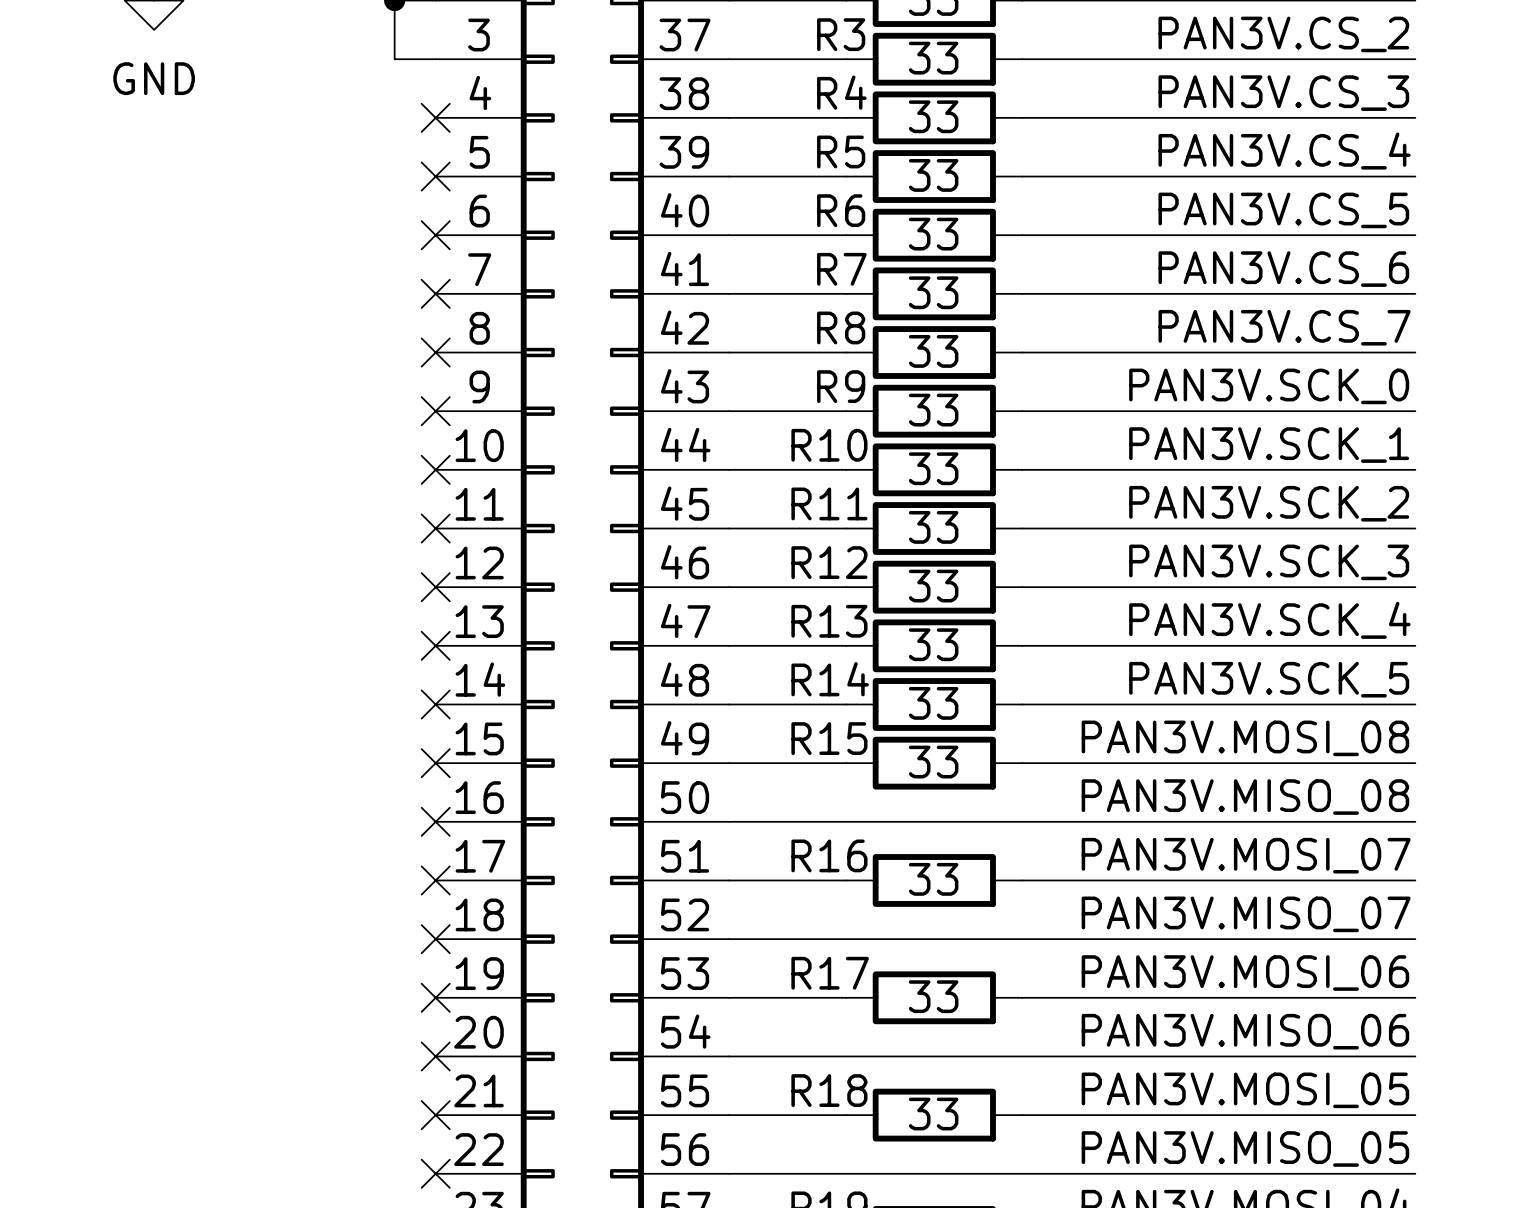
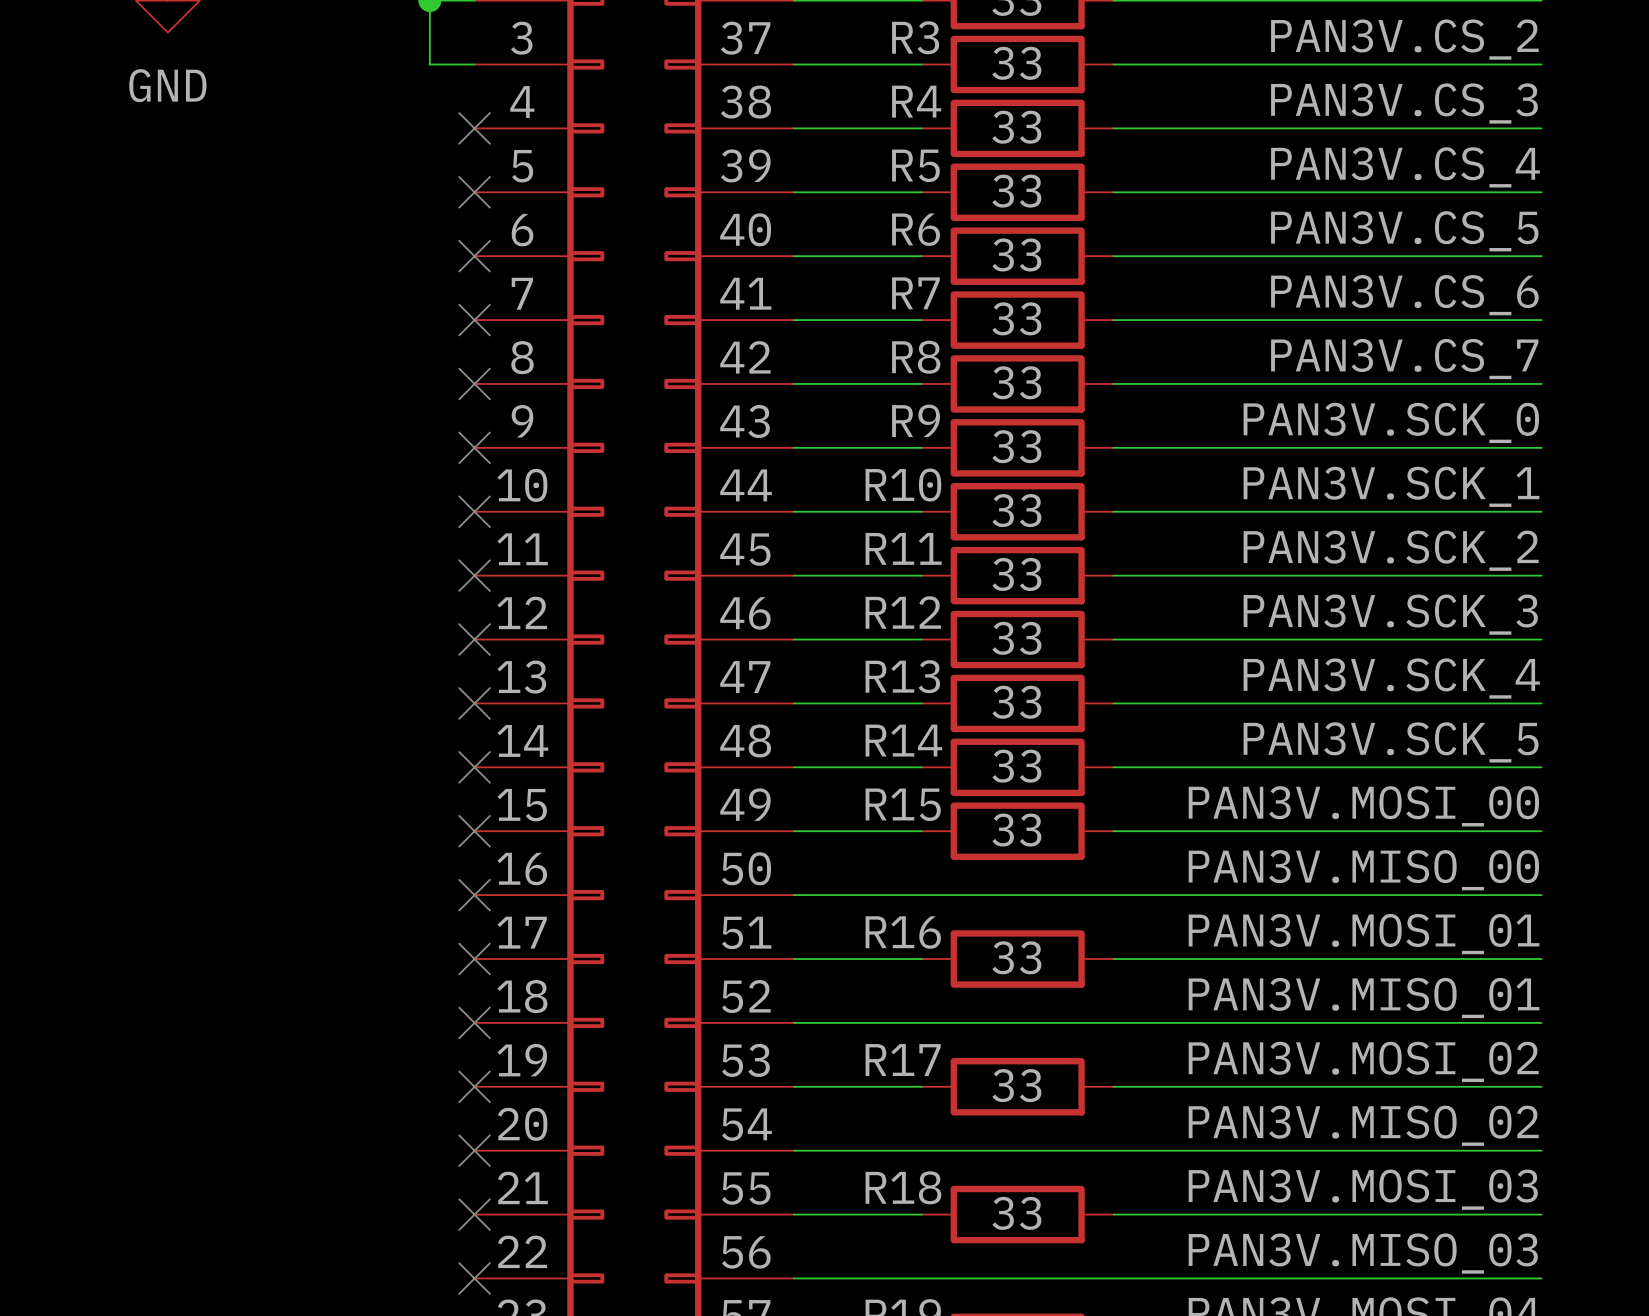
label: PAN3V.MOSI_08 (1245, 738) -> PAN3V.MOSI_00 (1363, 806)
label: PAN3V.MISO_08 (1245, 797) -> PAN3V.MISO_00 (1363, 870)
label: PAN3V.MOSI_07 (1246, 855) -> PAN3V.MOSI_01 (1364, 934)
label: PAN3V.MISO_07 (1246, 914) -> PAN3V.MISO_01 (1364, 997)
label: PAN3V.MOSI_06 (1245, 973) -> PAN3V.MOSI_02 (1363, 1061)
label: PAN3V.MISO_06 (1245, 1031) -> PAN3V.MISO_02 (1363, 1125)
label: PAN3V.MOSI_05 (1245, 1090) -> PAN3V.MOSI_03 (1363, 1189)
label: PAN3V.MISO_05 (1245, 1149) -> PAN3V.MISO_03 (1363, 1253)

